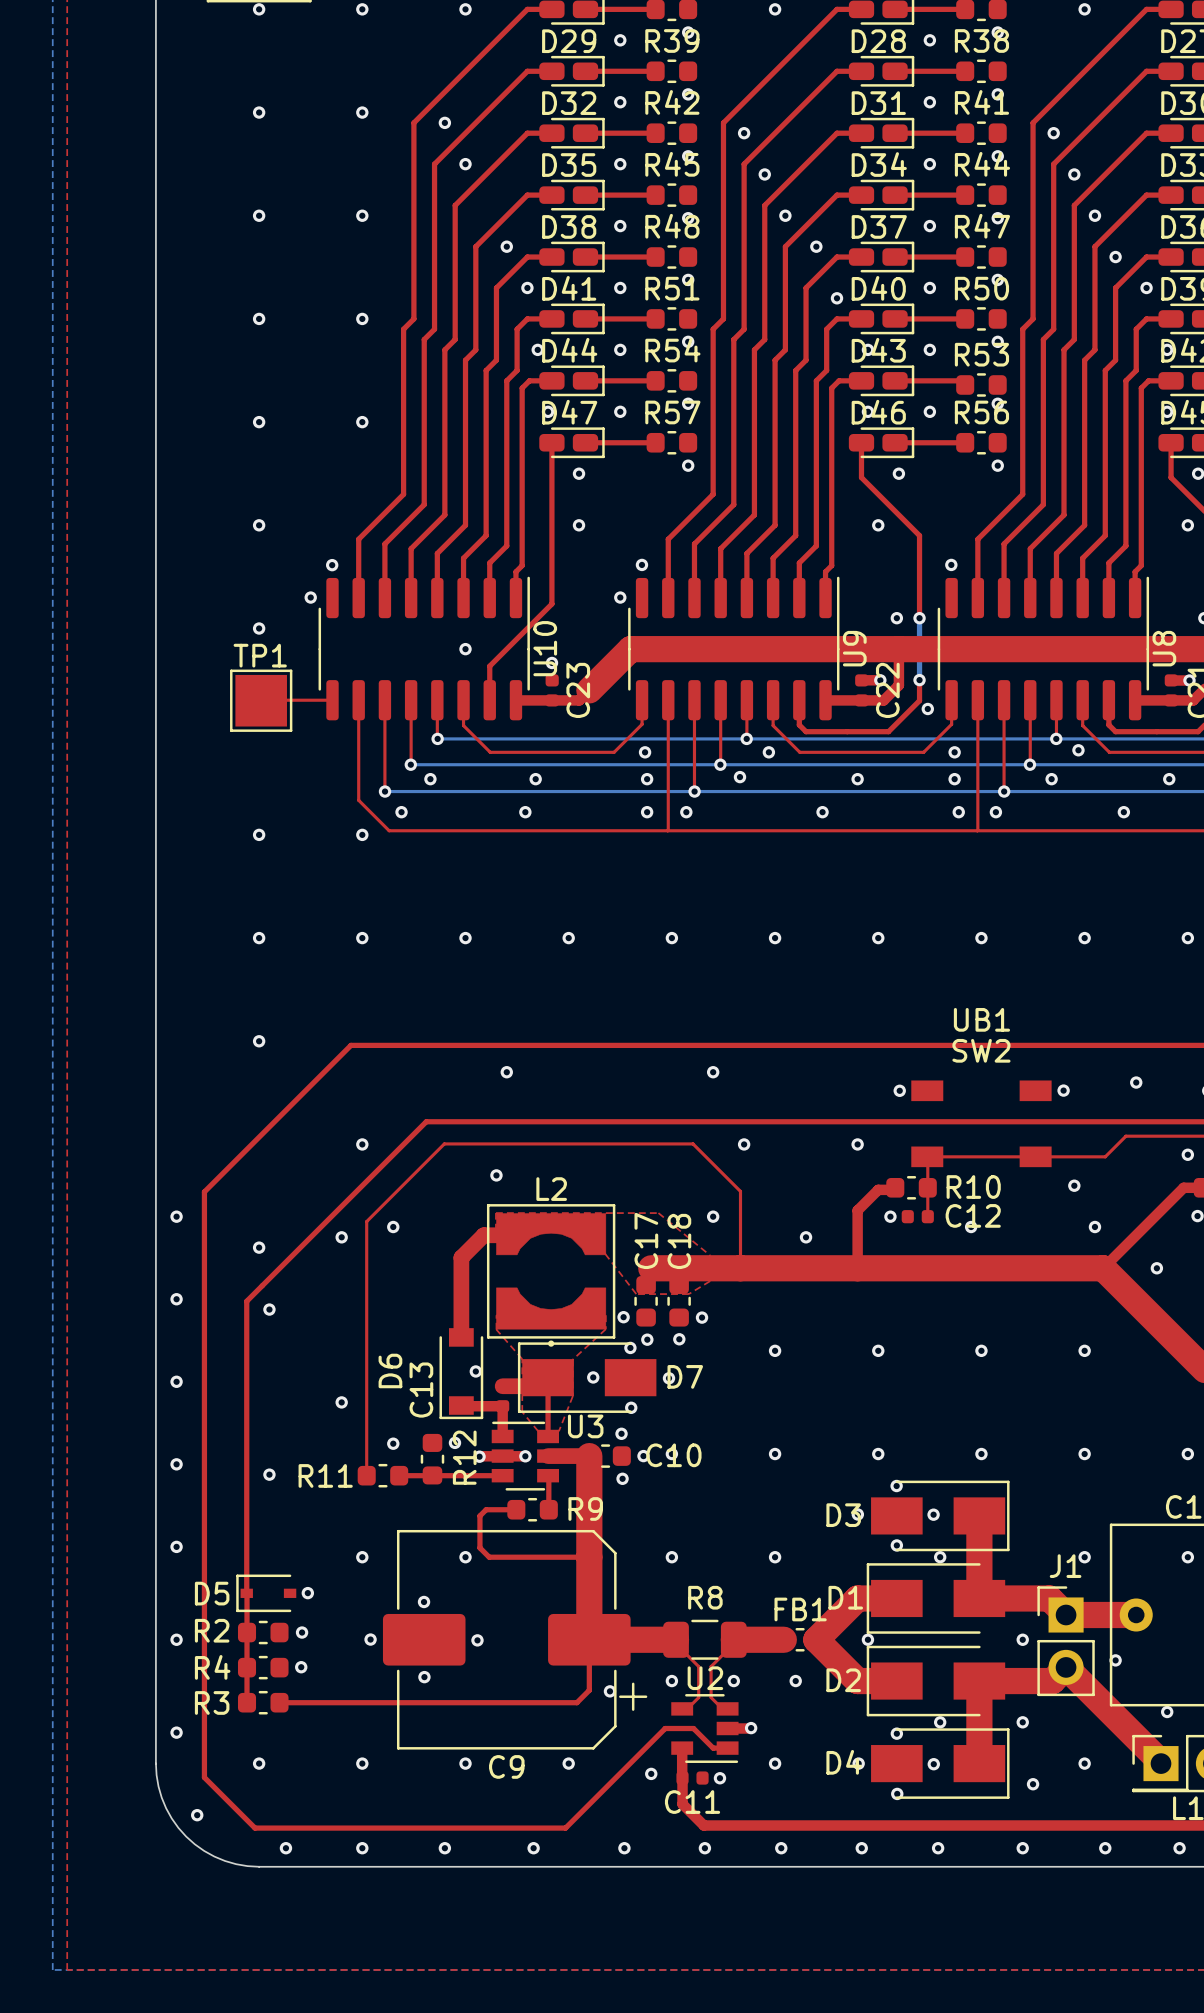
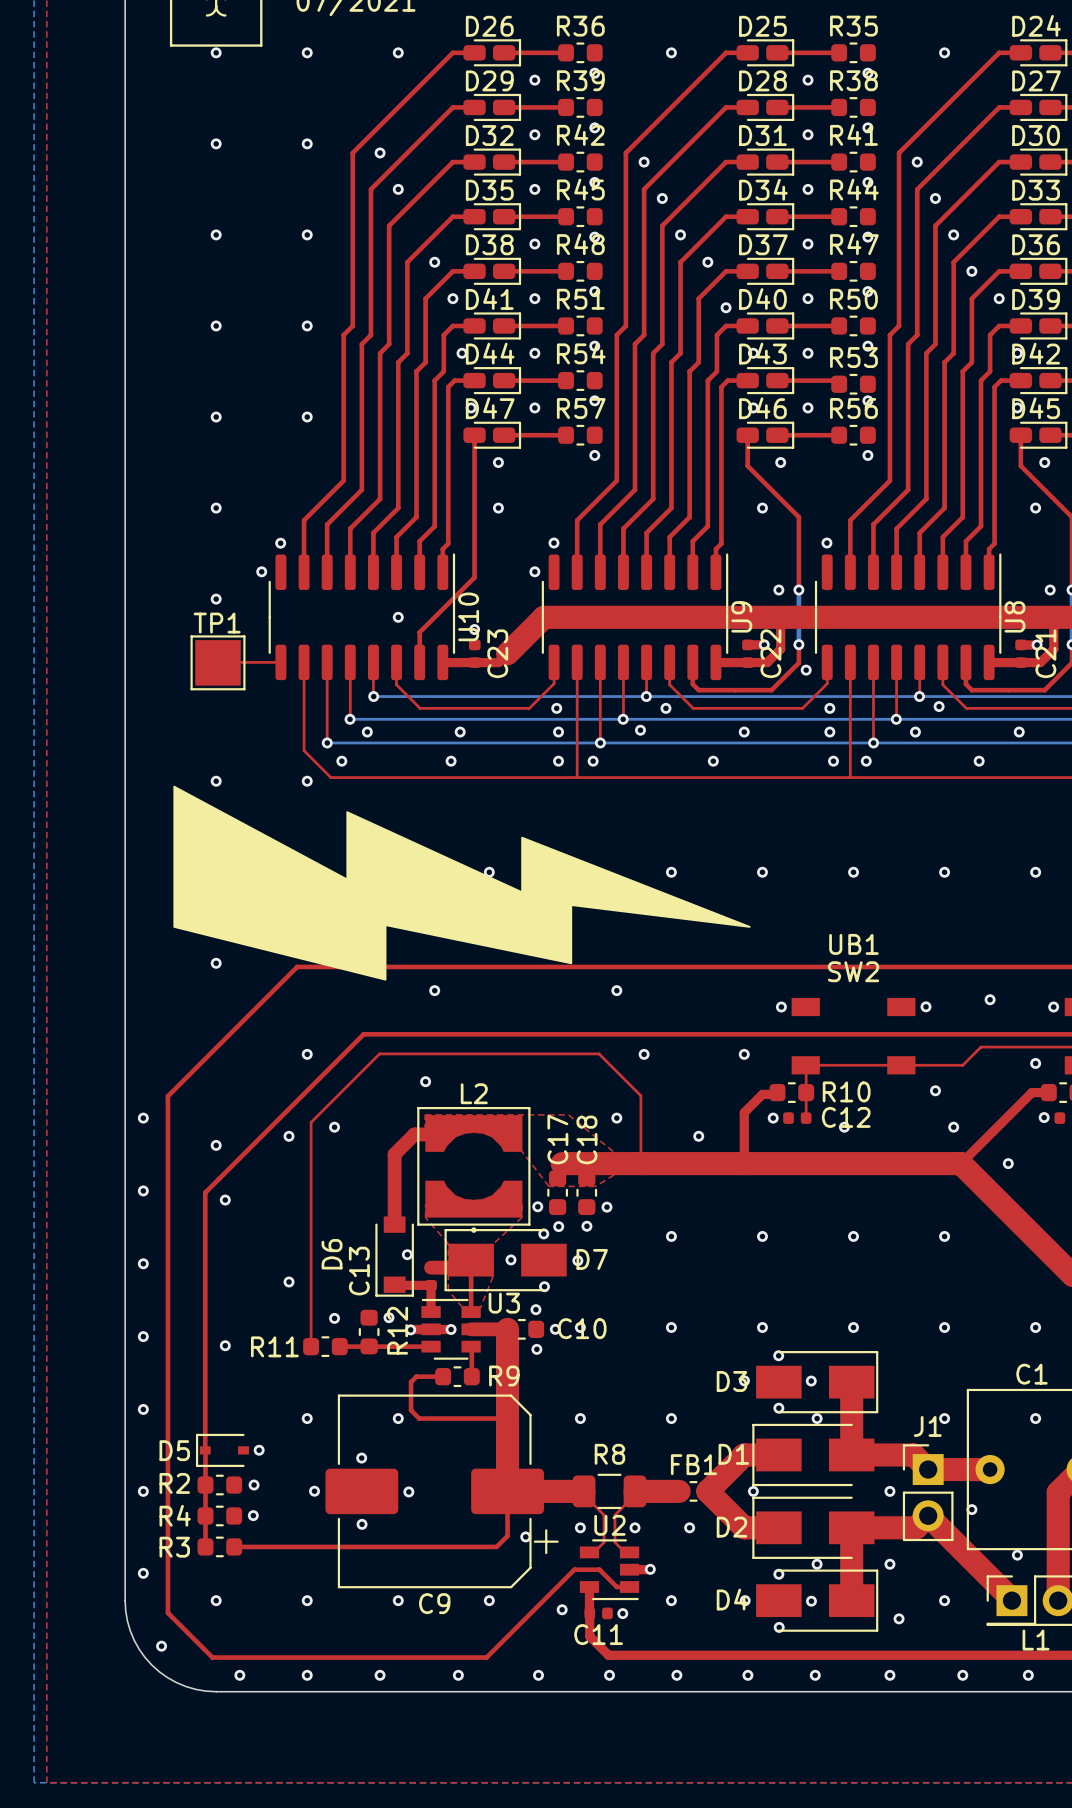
drawing: none -> [173, 785, 751, 981]

